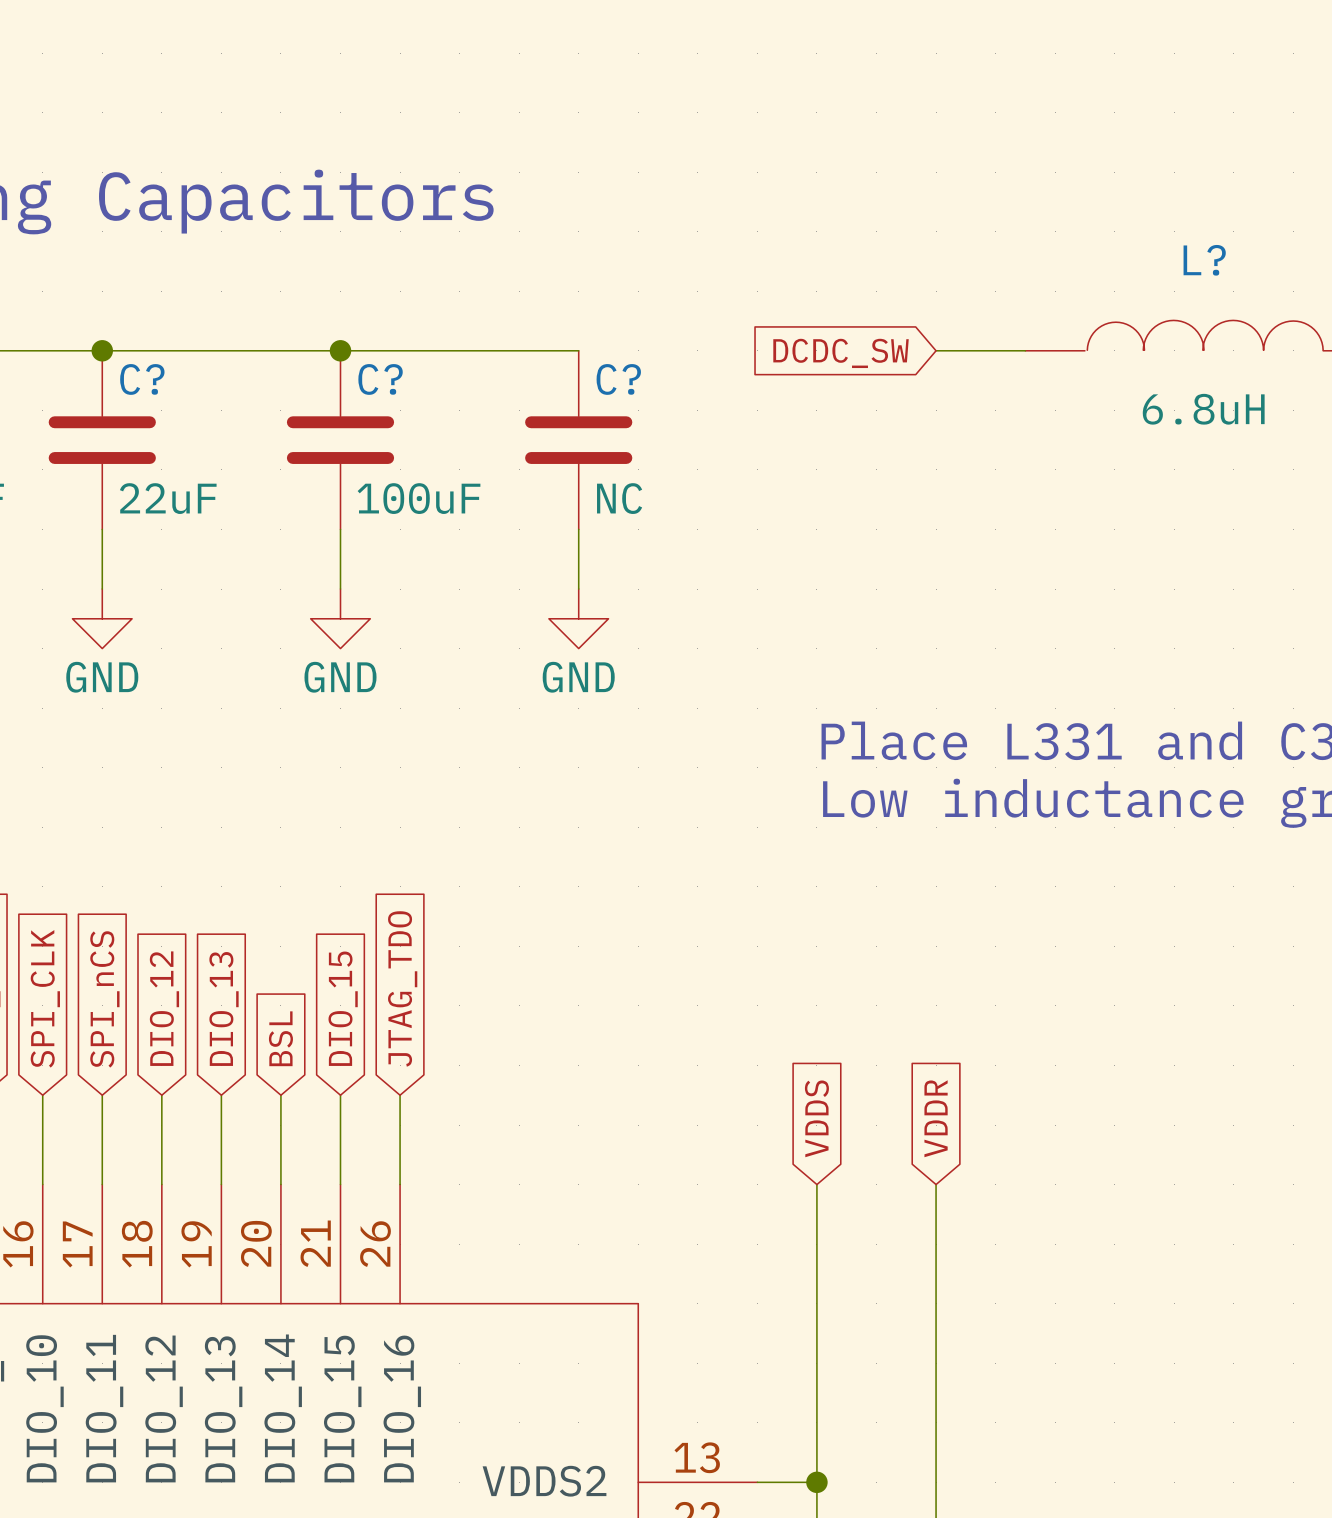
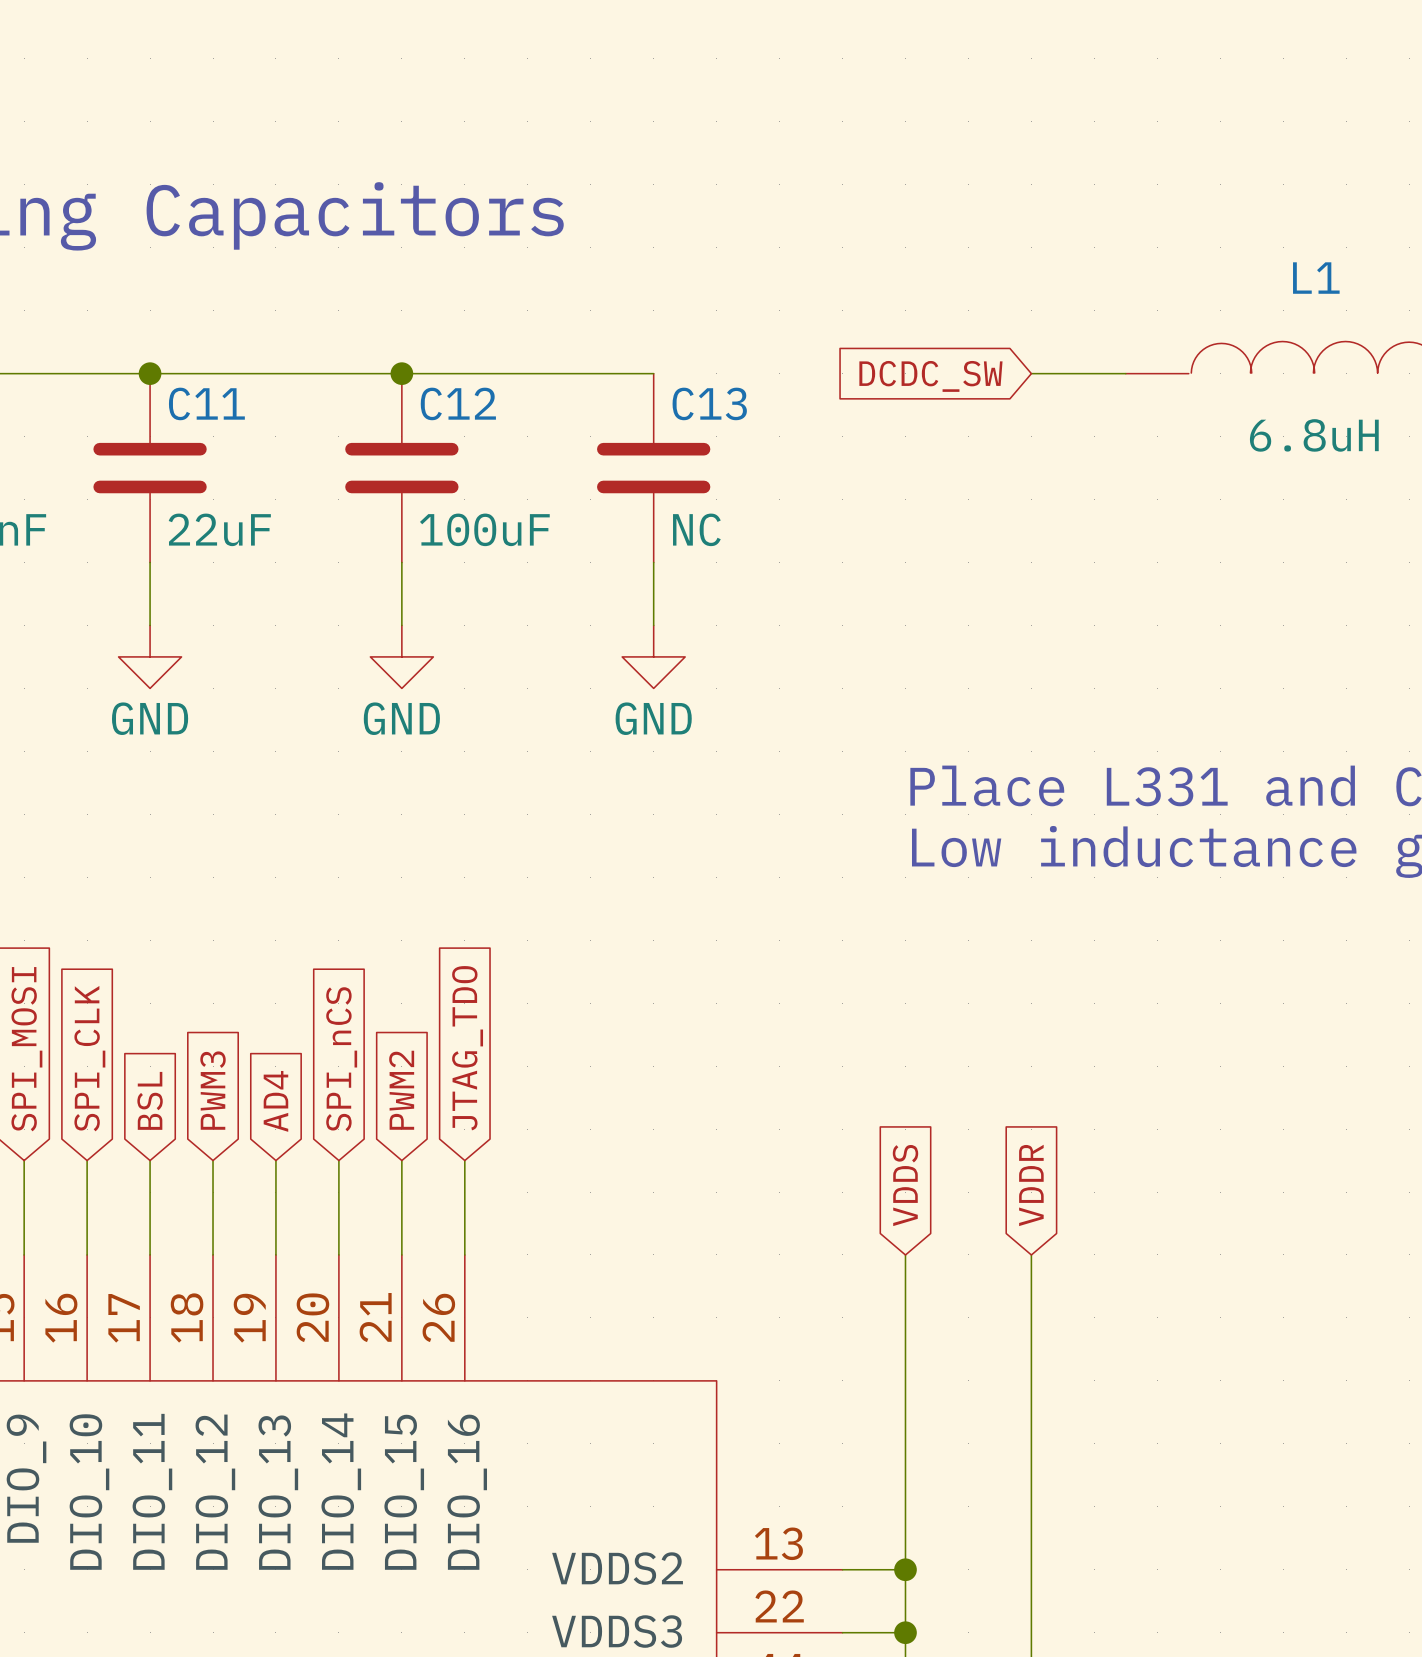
L? name: L? (1204, 260) -> L1 (1316, 278)
C? name: C? (142, 379) -> C11 (206, 403)
C? name: C? (380, 379) -> C12 (458, 403)
C? name: C? (618, 379) -> C13 (709, 403)
global label: SPI_nCS (104, 999) -> BSL (150, 1100)
global label: DIO_12 (164, 1008) -> PWM3 (213, 1090)
global label: DIO_13 (224, 1008) -> AD4 (275, 1101)
global label: DIO_15 (343, 1008) -> PWM2 (401, 1090)
global label: BSL (280, 1038) -> SPI_nCS (341, 1059)

